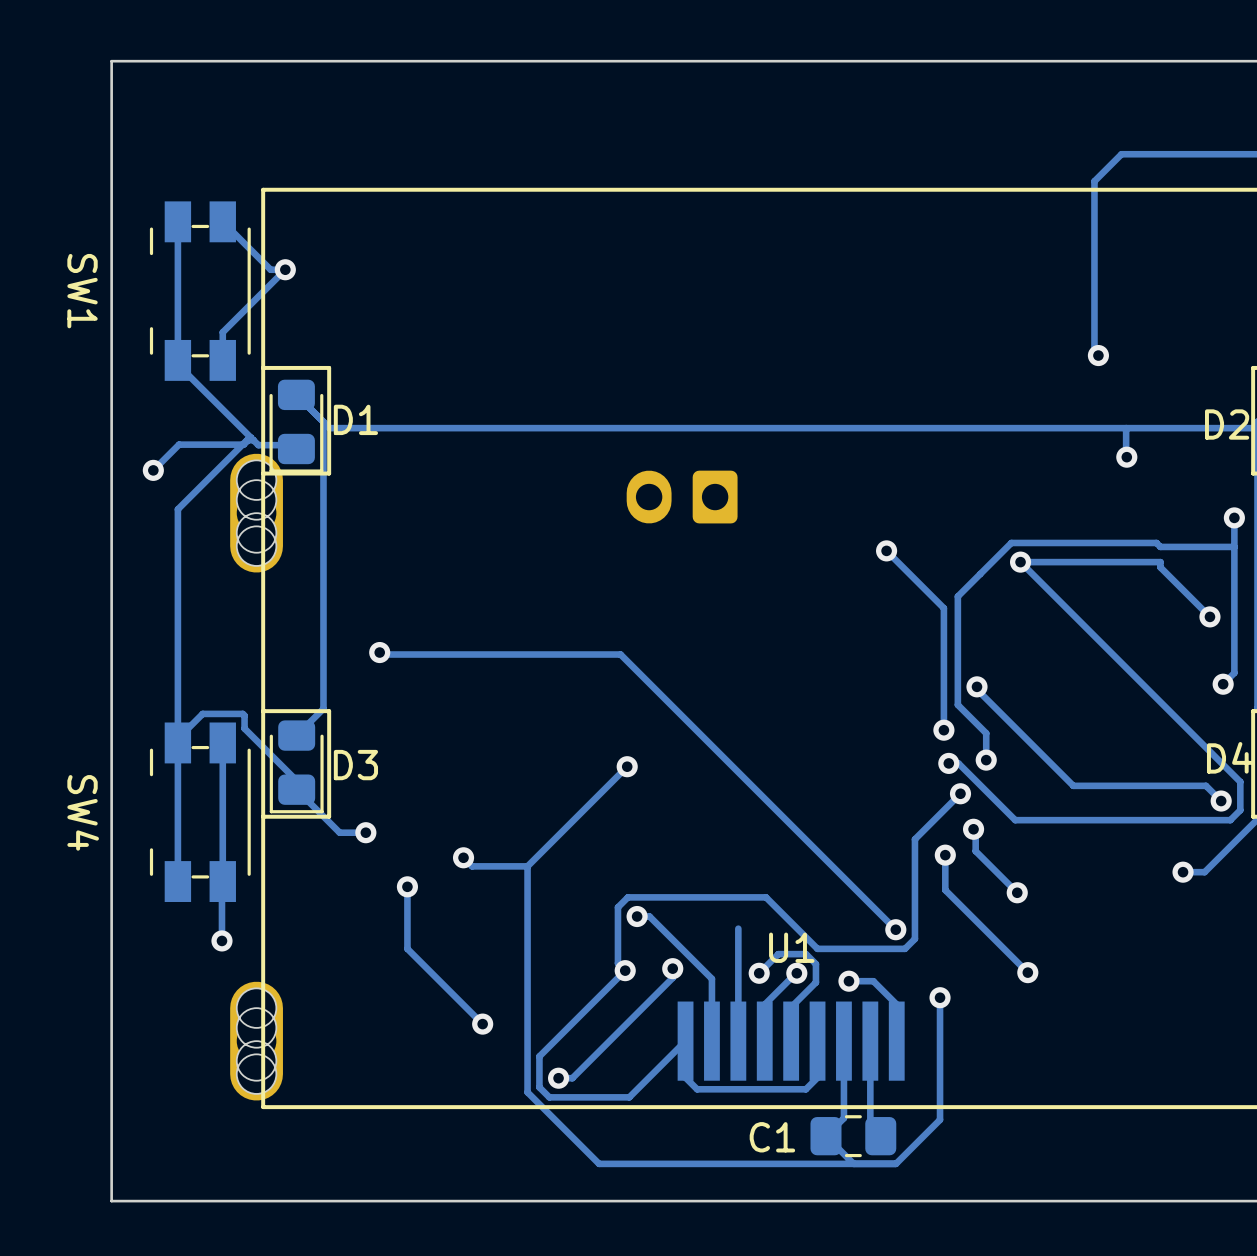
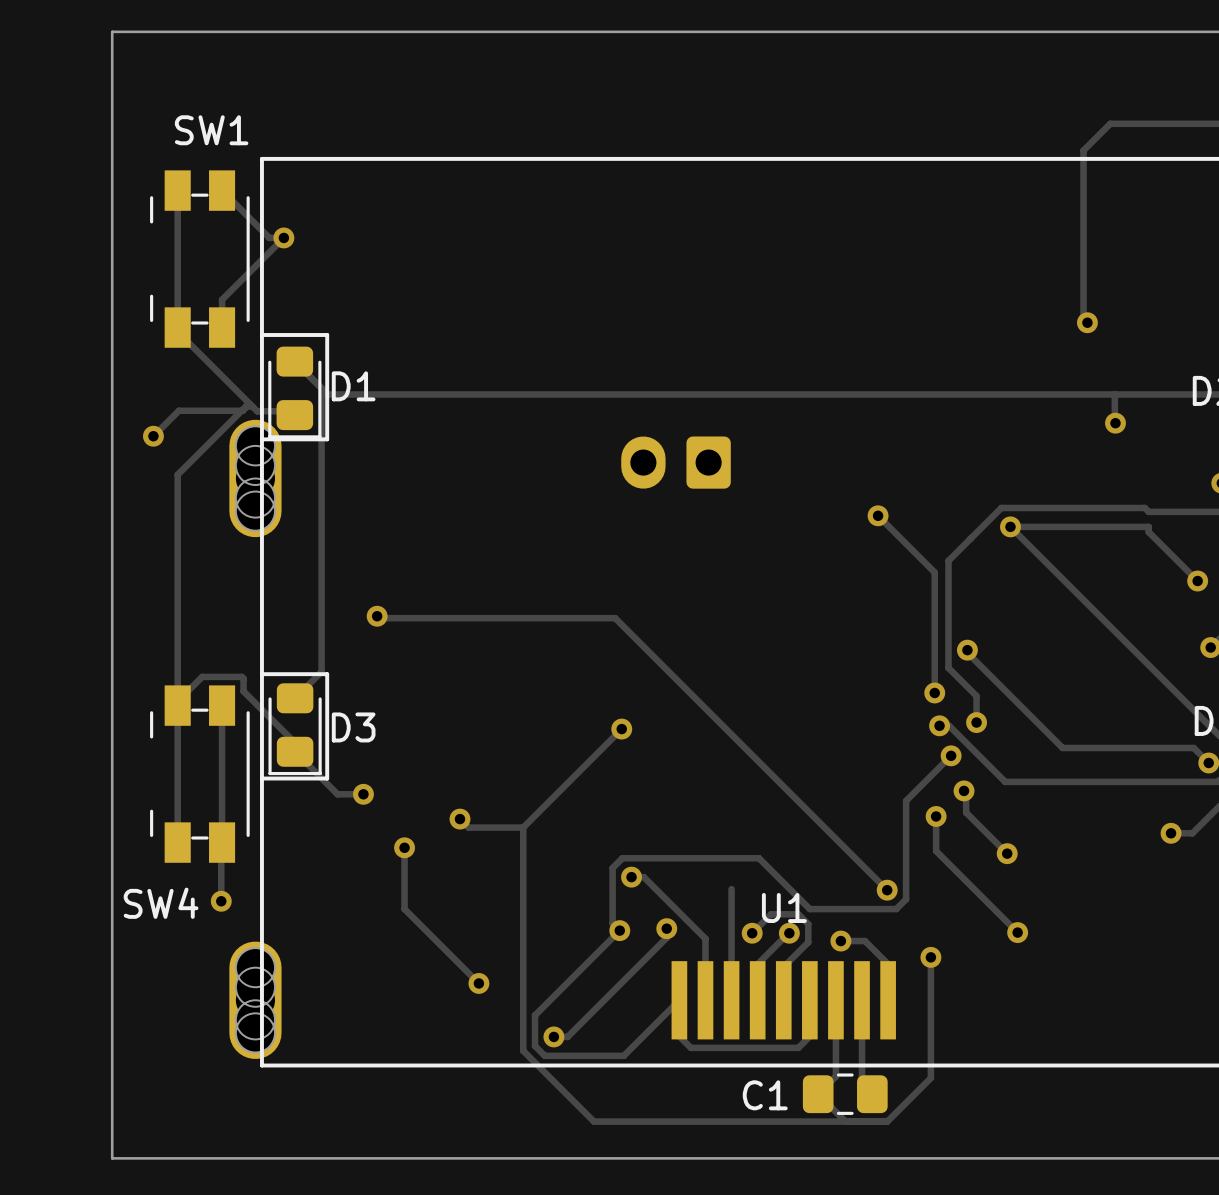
SW1 name rotation: 0° (82, 291) -> 90° counterclockwise (211, 130)
SW1 name position: SW1 (82, 291) -> SW1 (211, 130)
SW4 name rotation: 0° (83, 812) -> 90° counterclockwise (161, 903)
SW4 name position: SW4 (83, 812) -> SW4 (161, 903)

